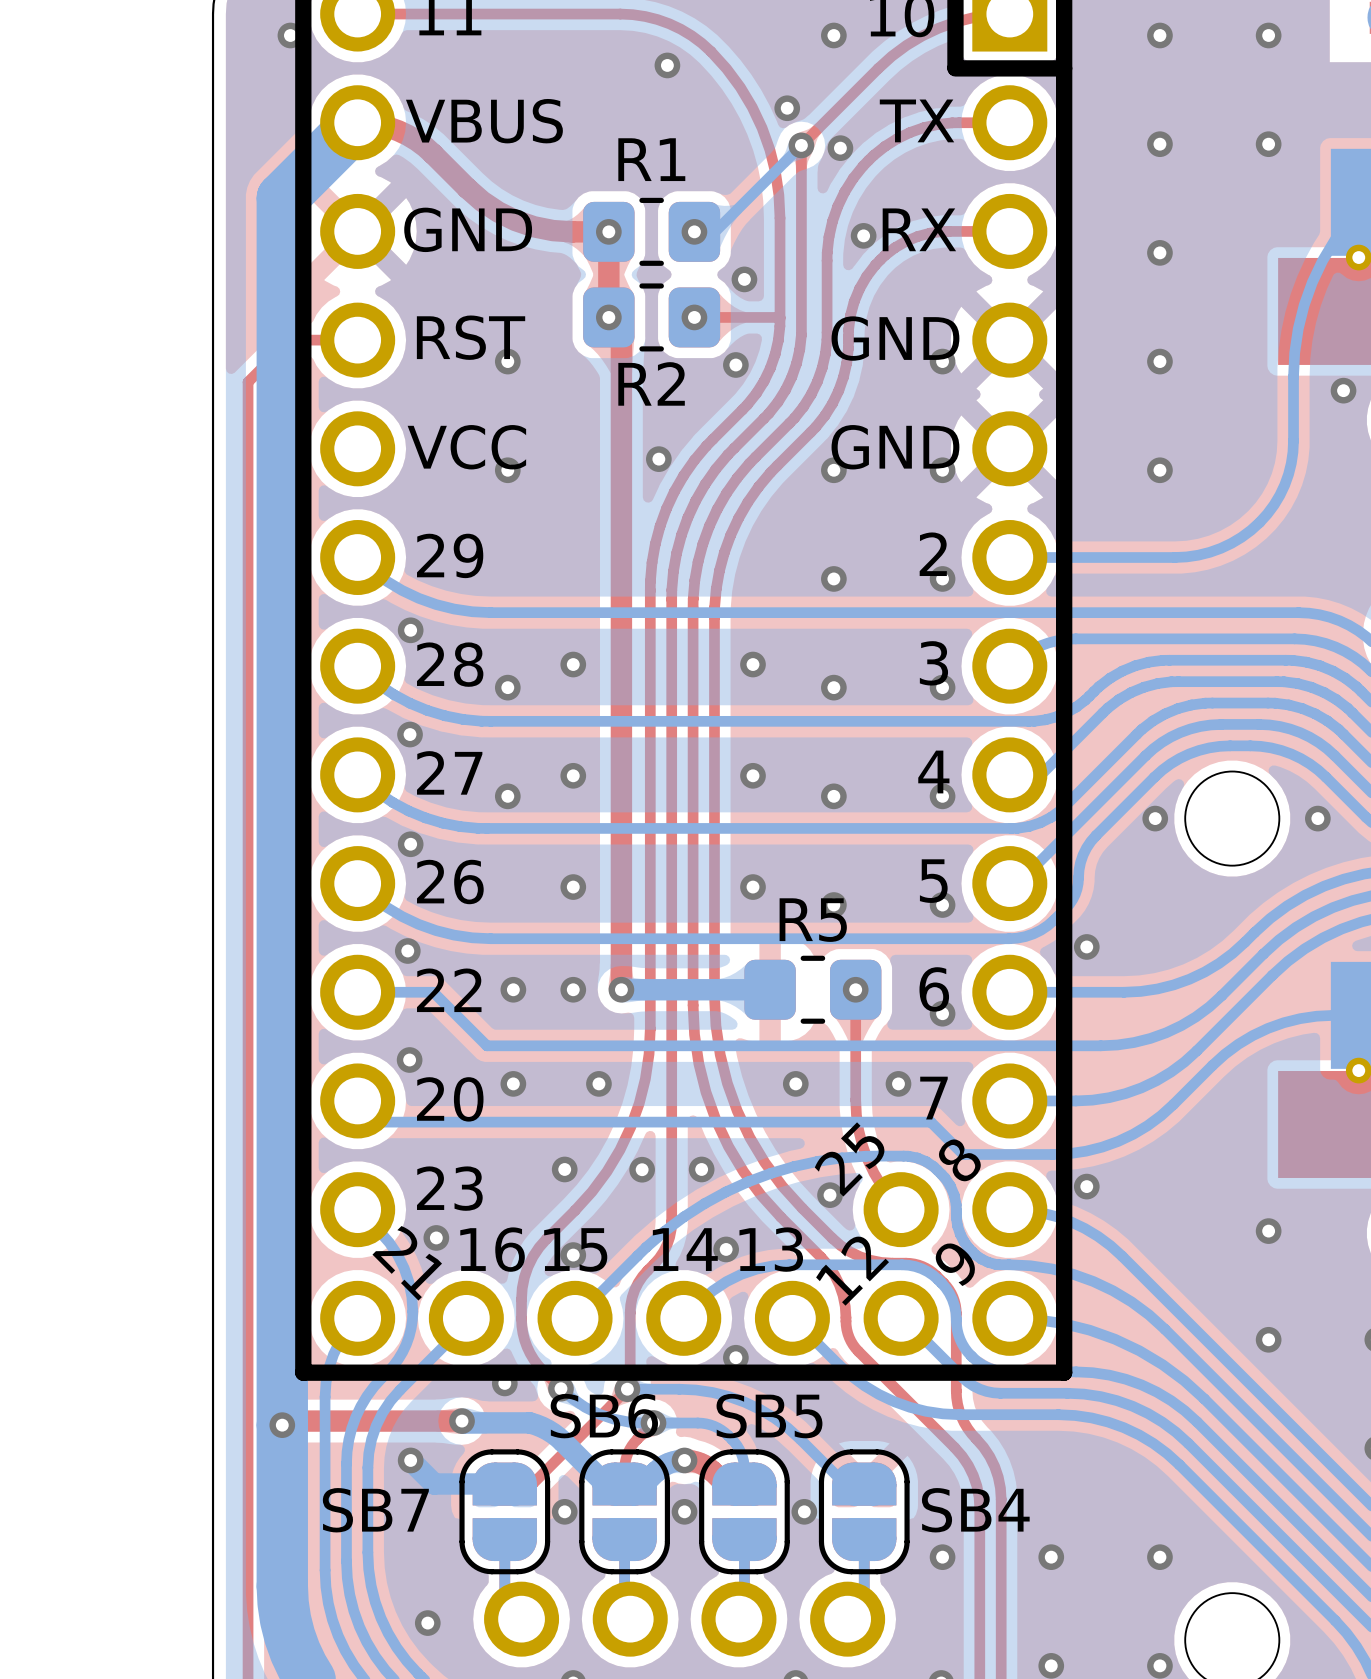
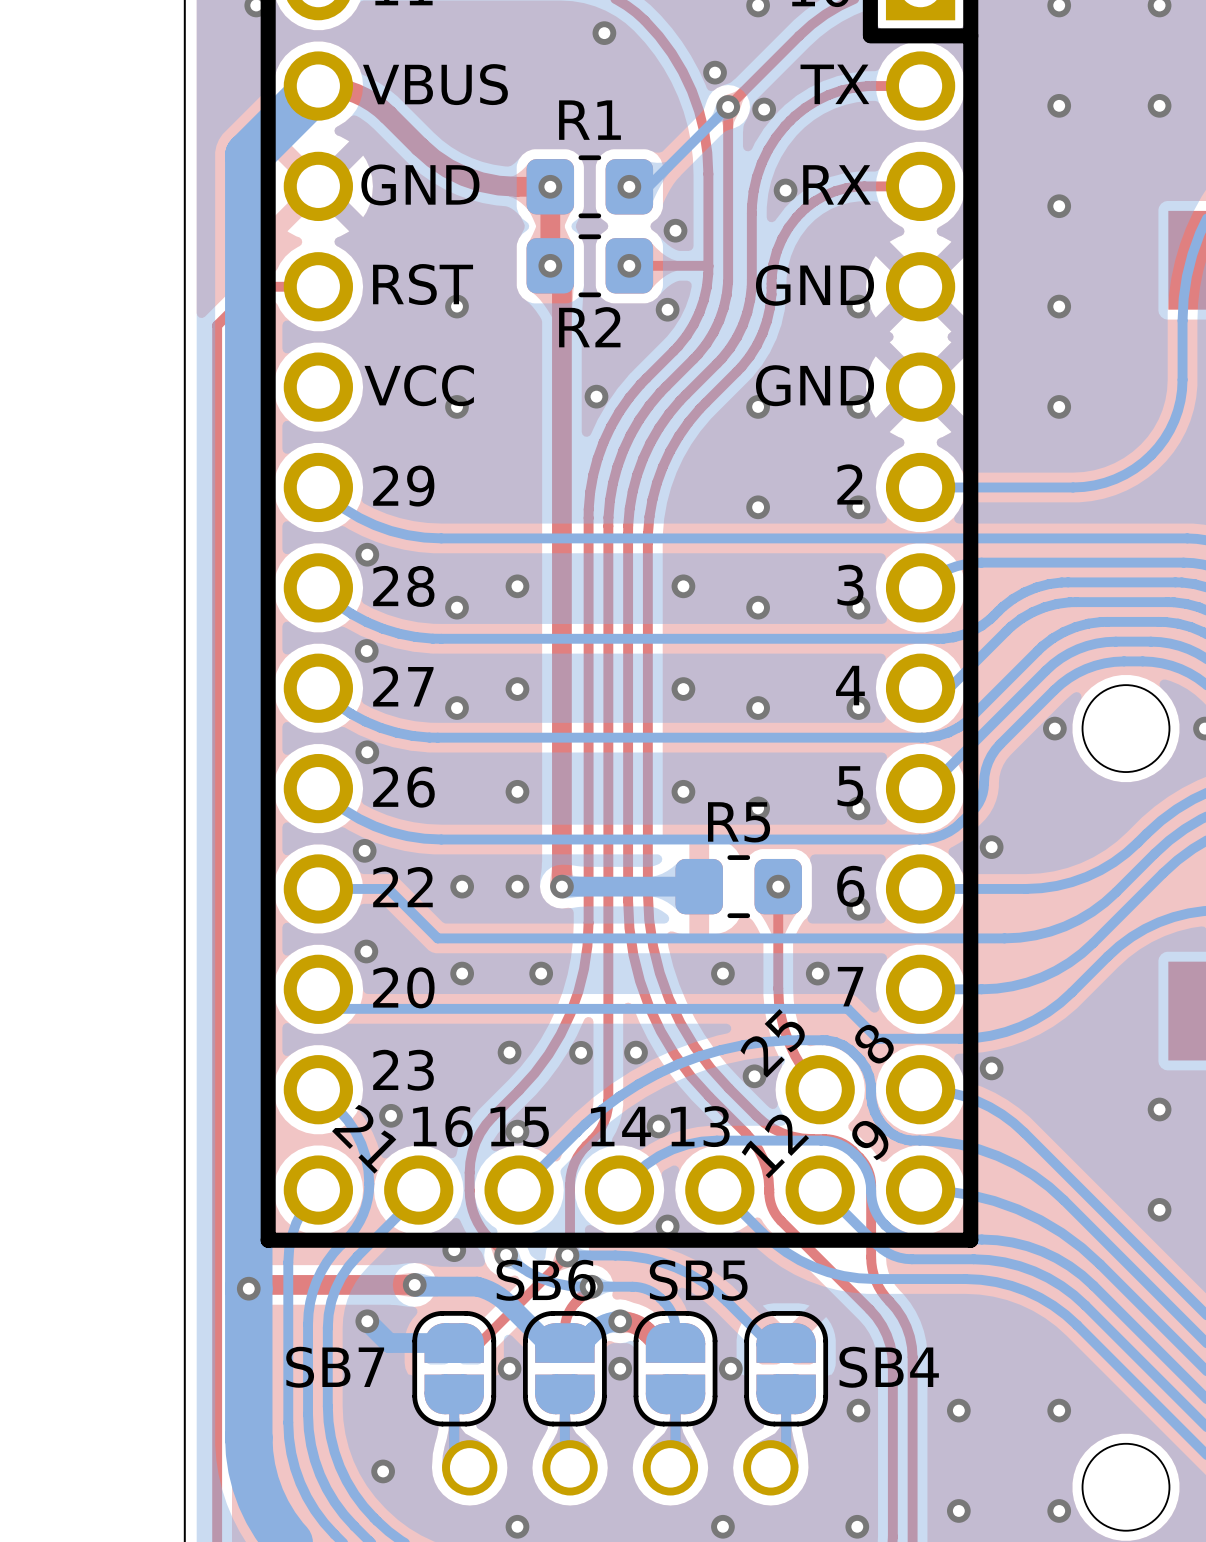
part footprint: [484, 1581, 886, 1657] -> [442, 1440, 799, 1496]

